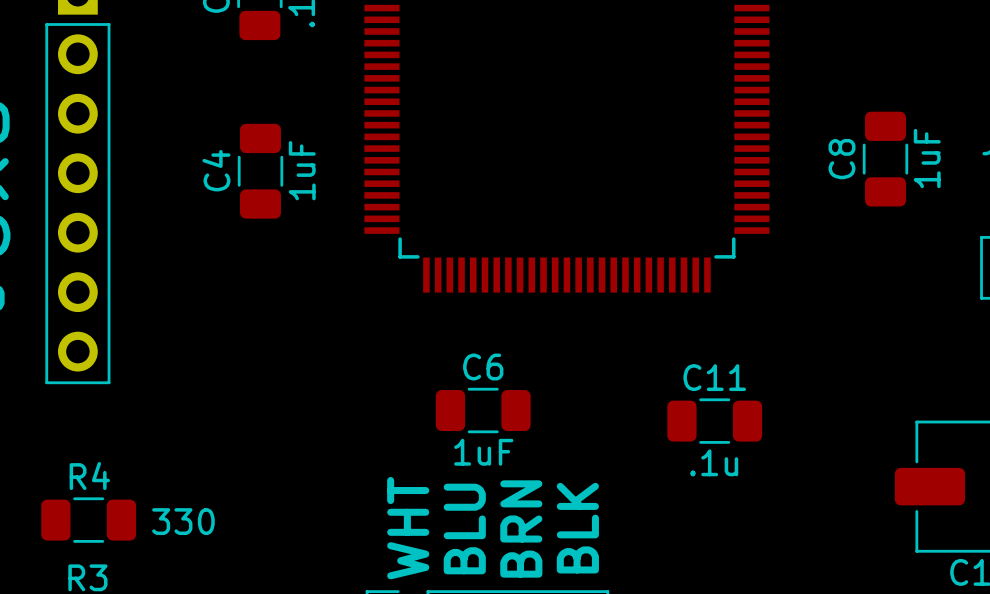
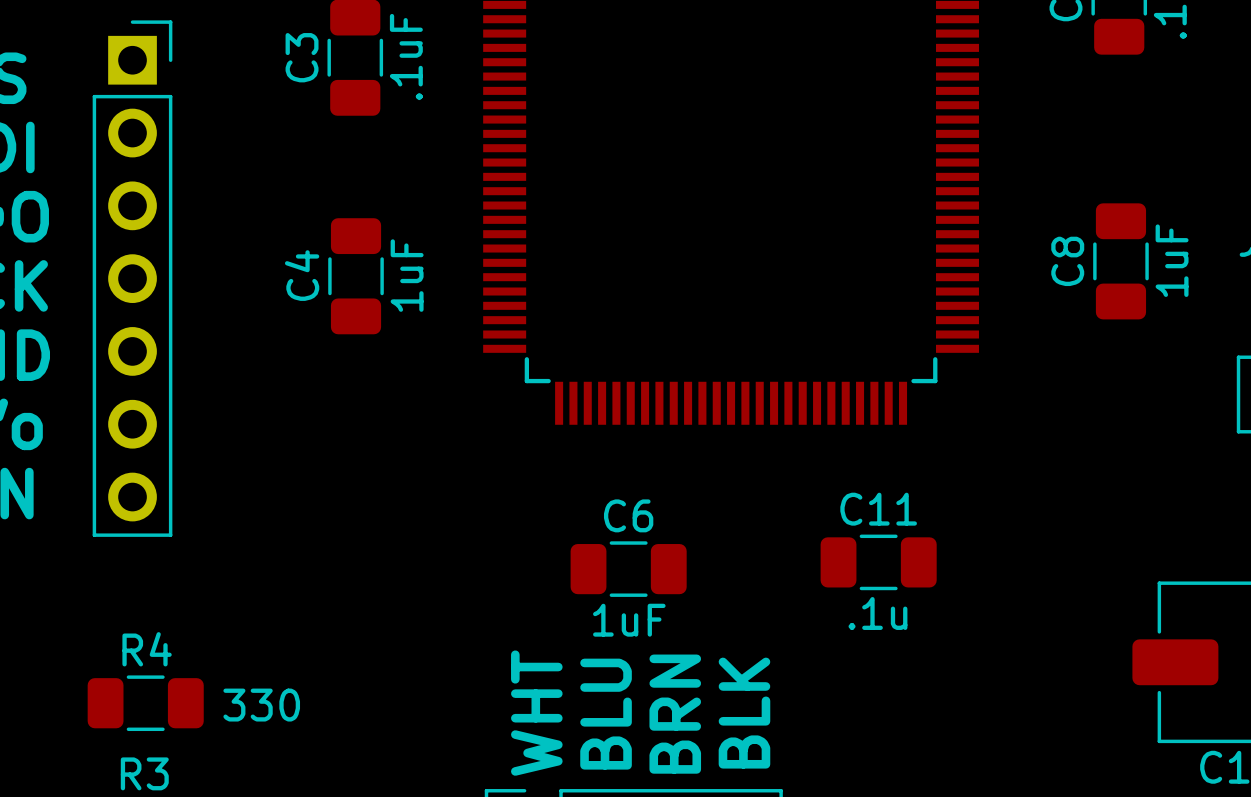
C11 position: (714, 421) -> (878, 562)

